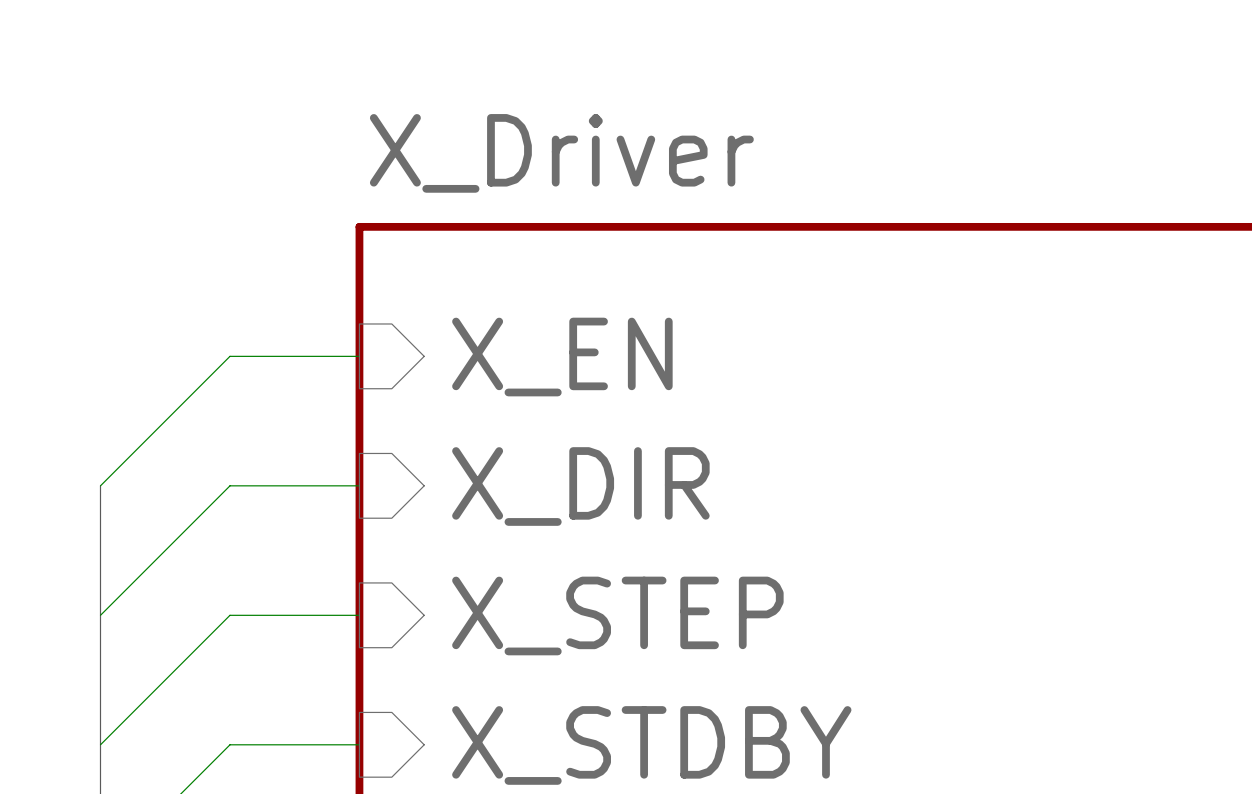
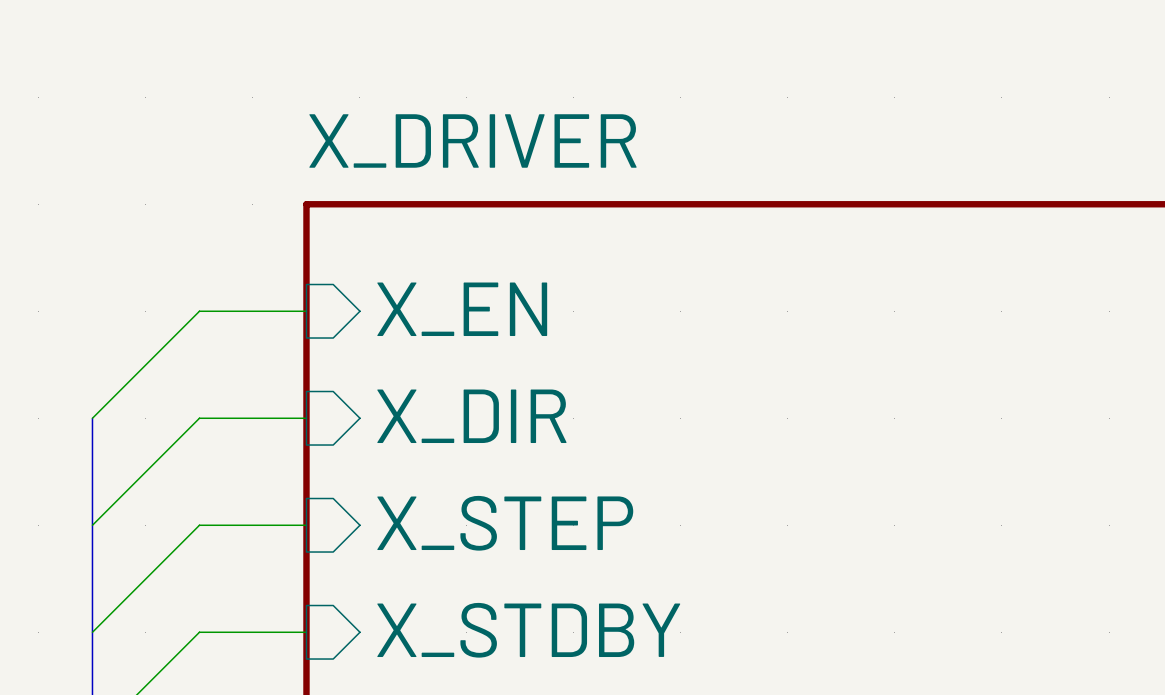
sheet X_Driver name: X_Driver (561, 153) -> X_DRIVER (472, 140)

